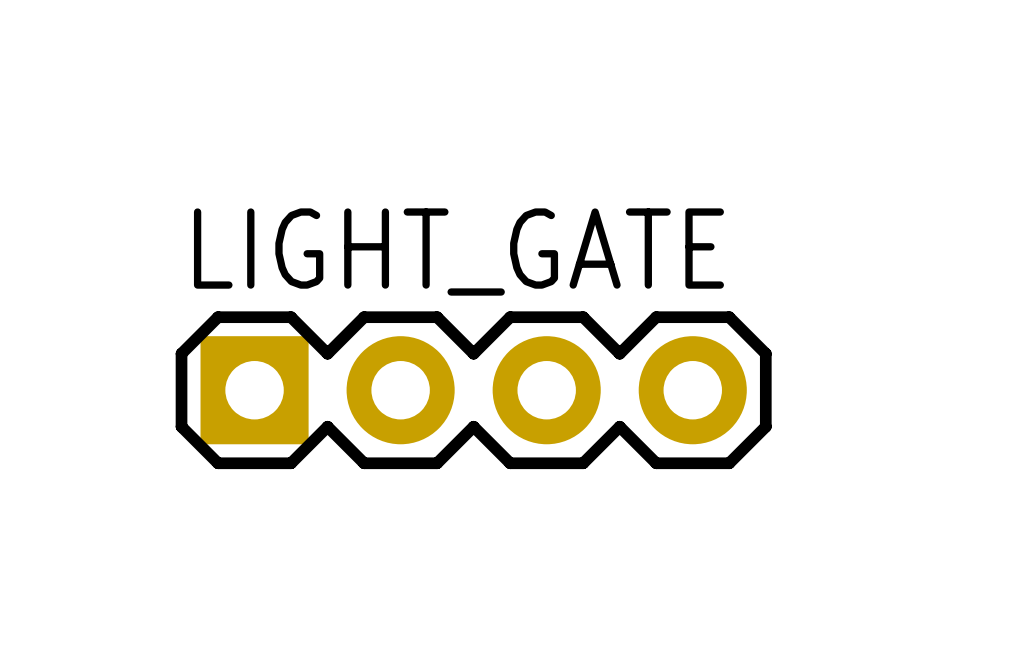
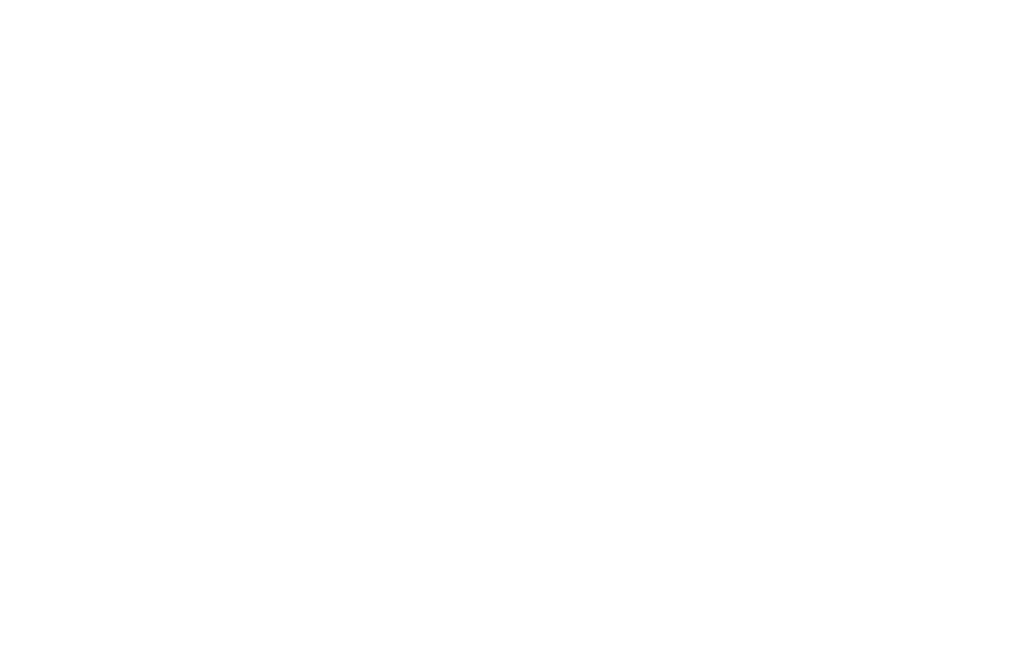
LIGHT_GATE: (473, 390) -> none

